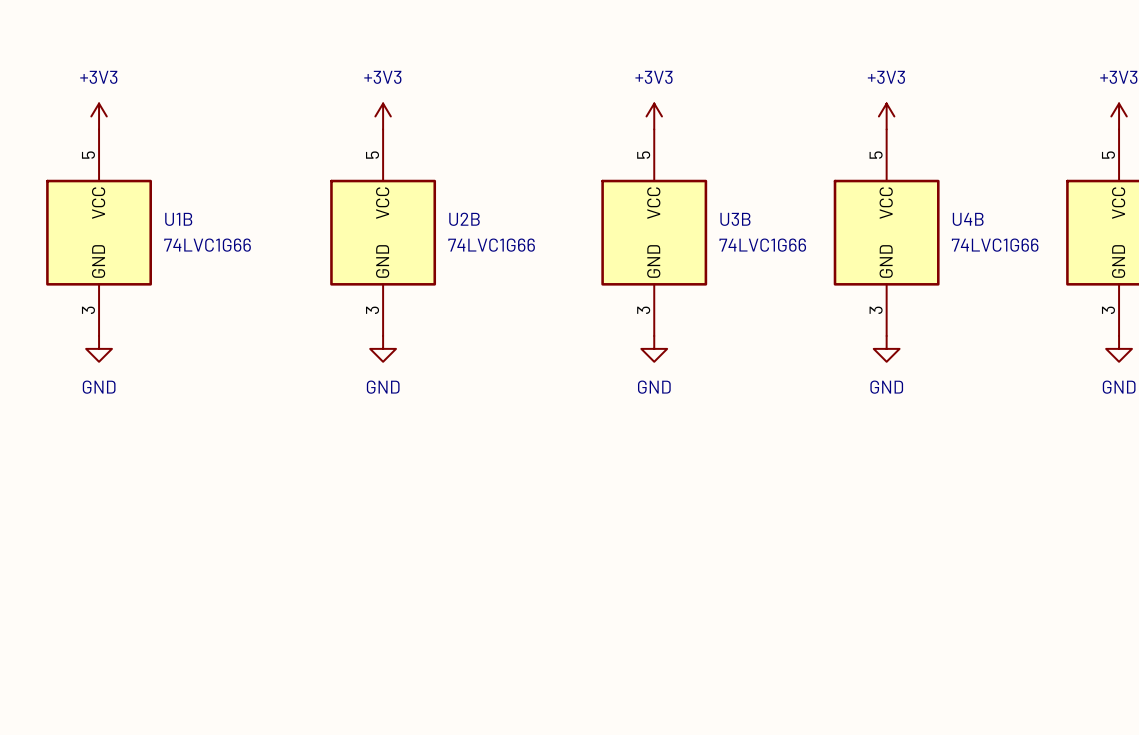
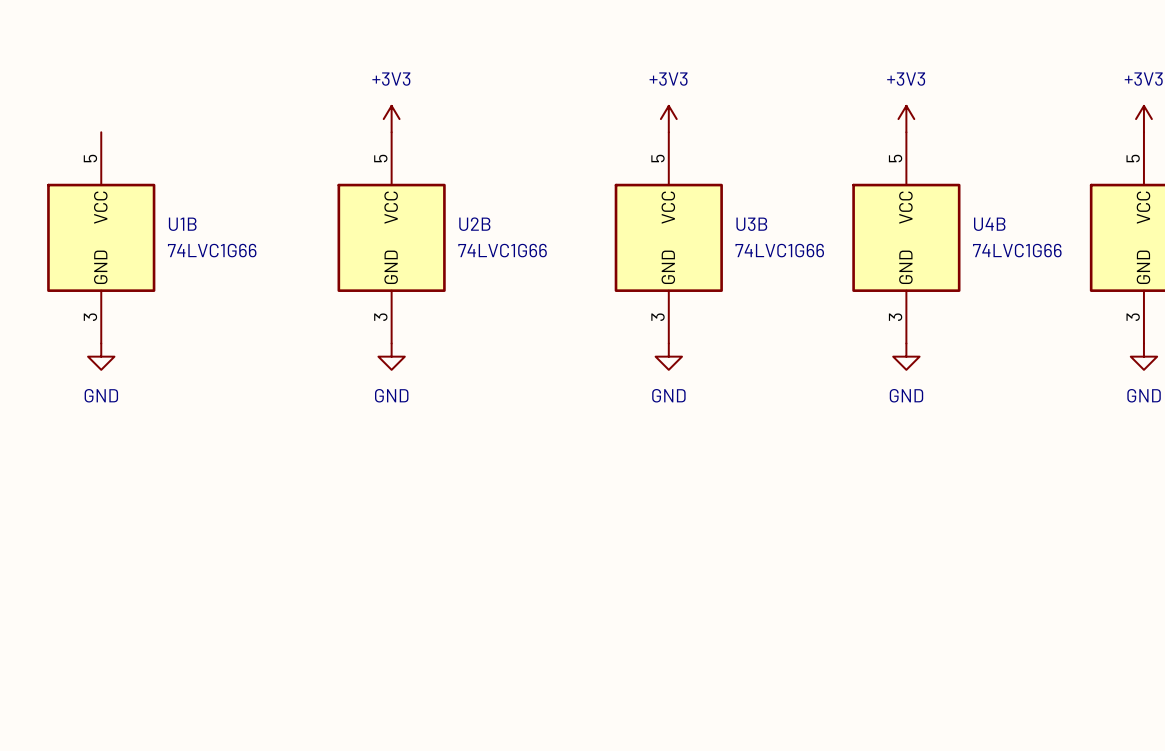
power symbol: +3V3 (99, 116) -> none

